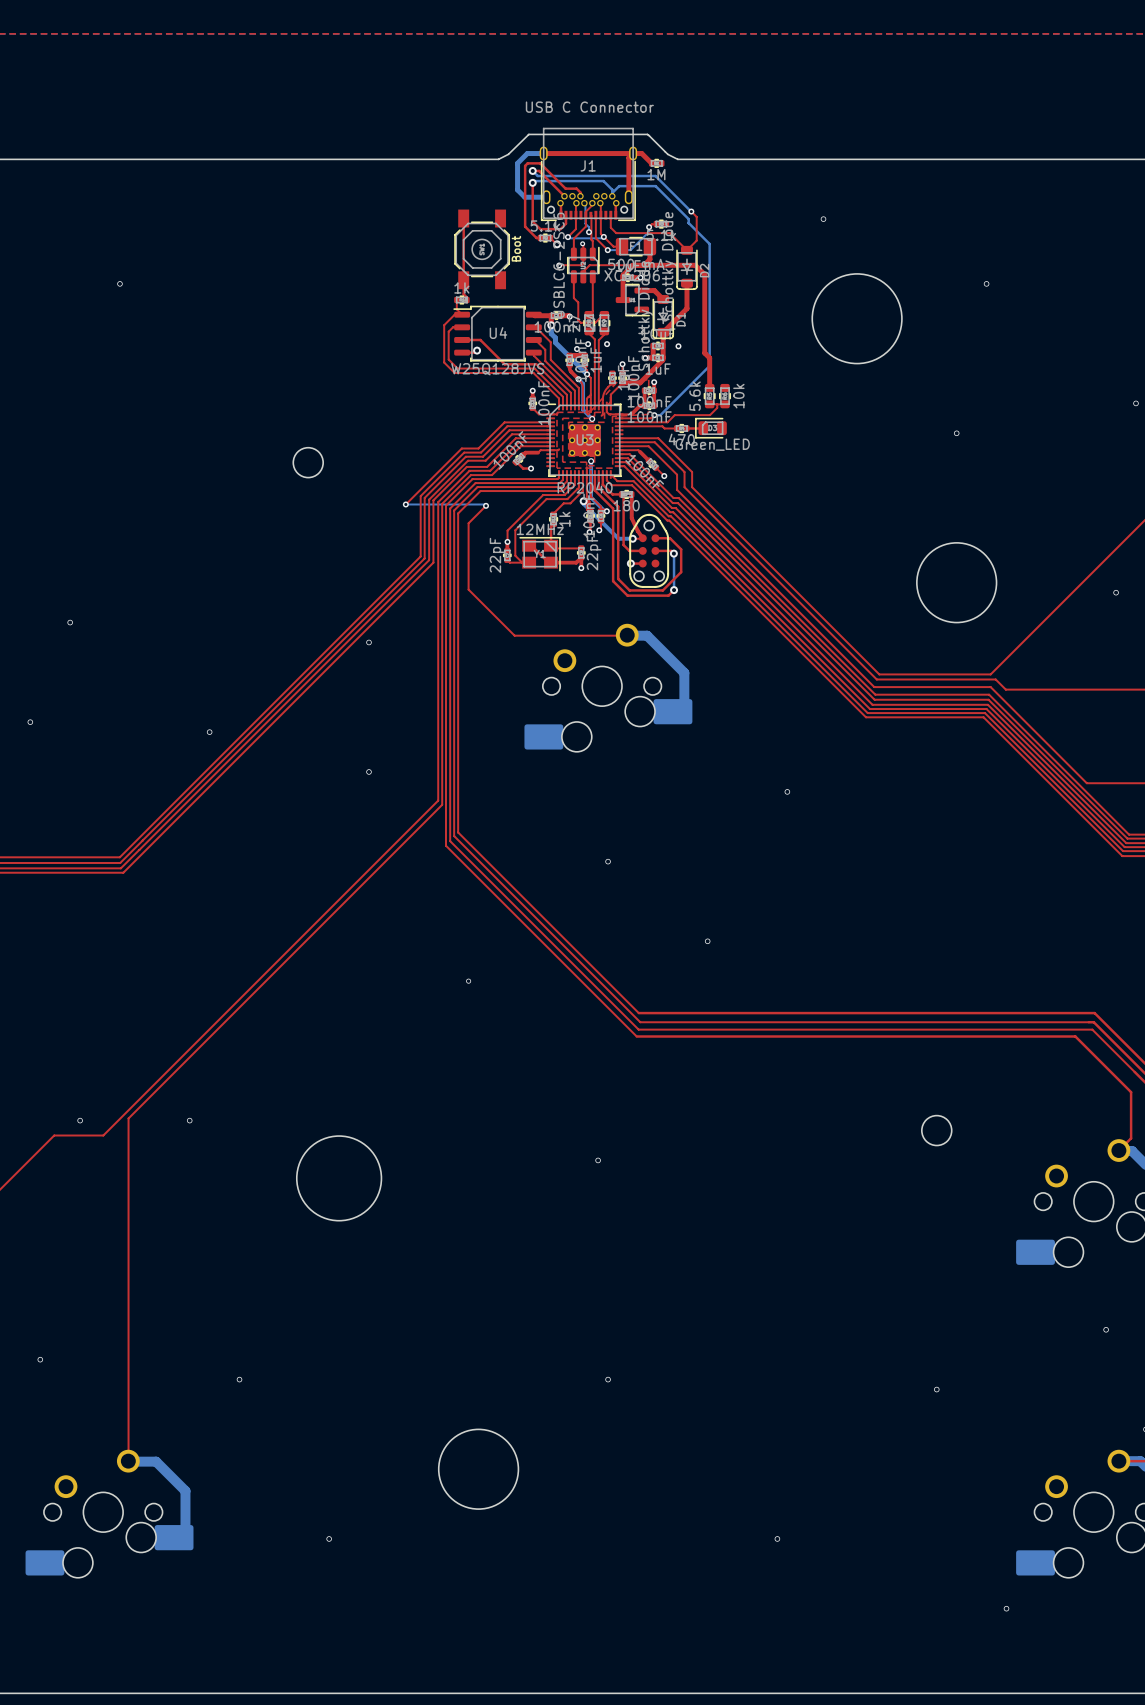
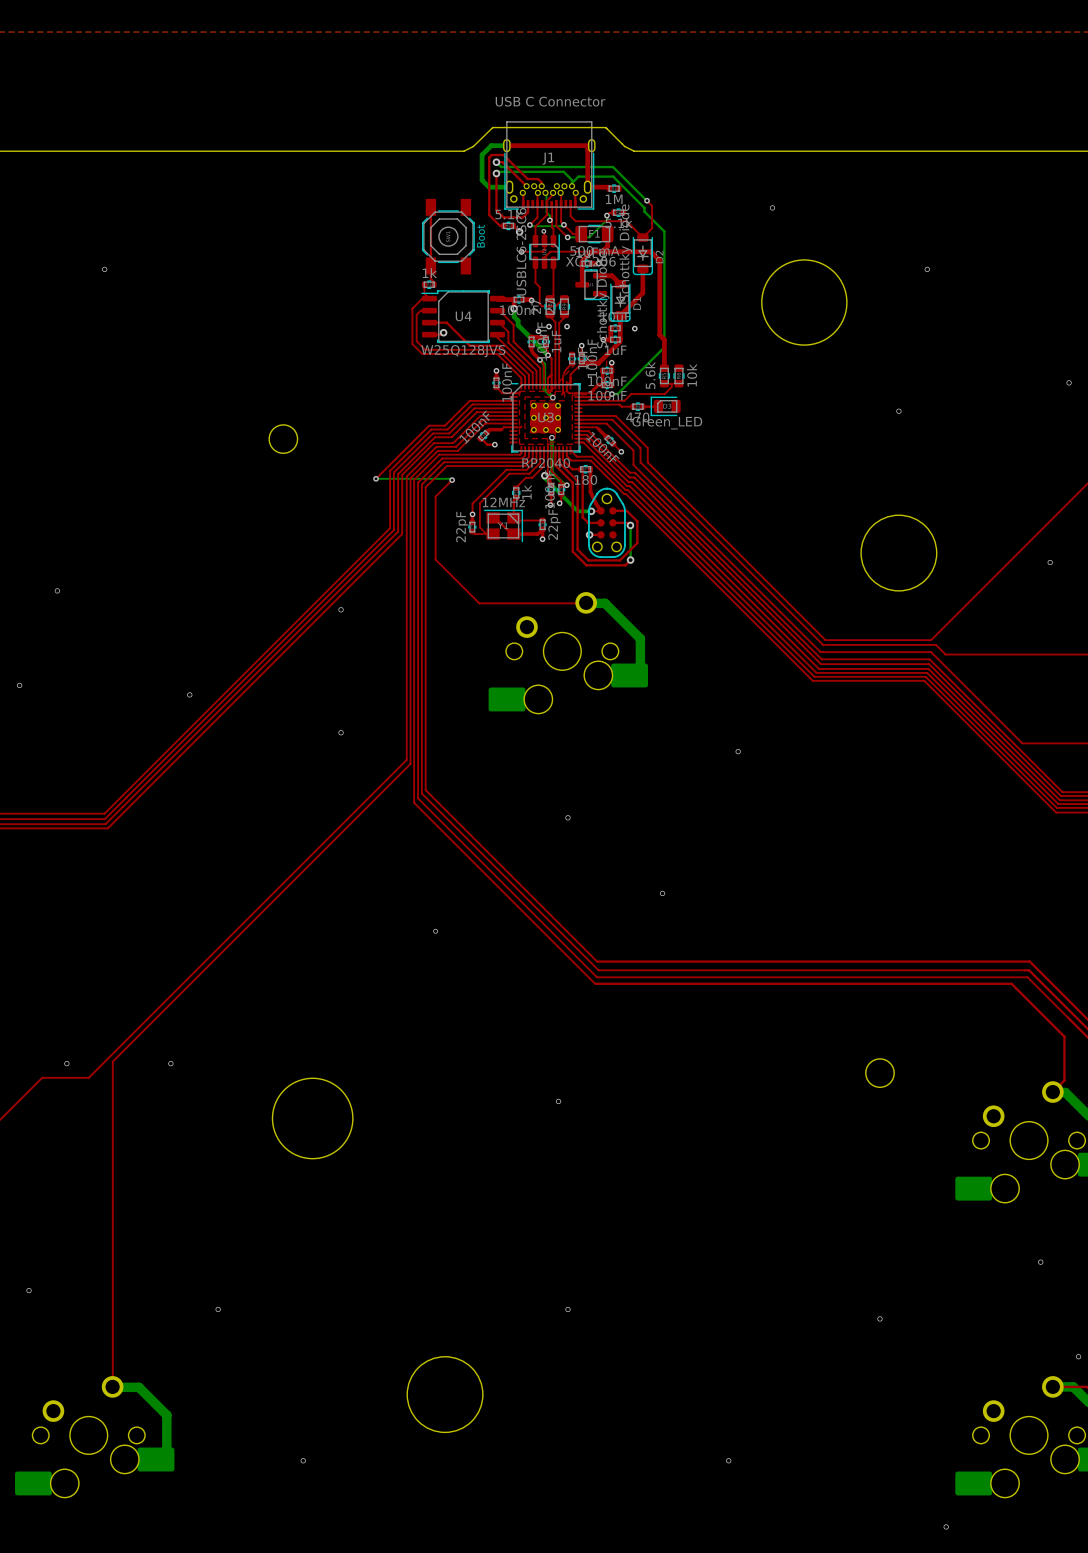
top track: (633, 153) (641, 153) (651, 163) -> none
part position: (656, 163) -> (614, 188)
top track: none -> (587, 187) (609, 188)

